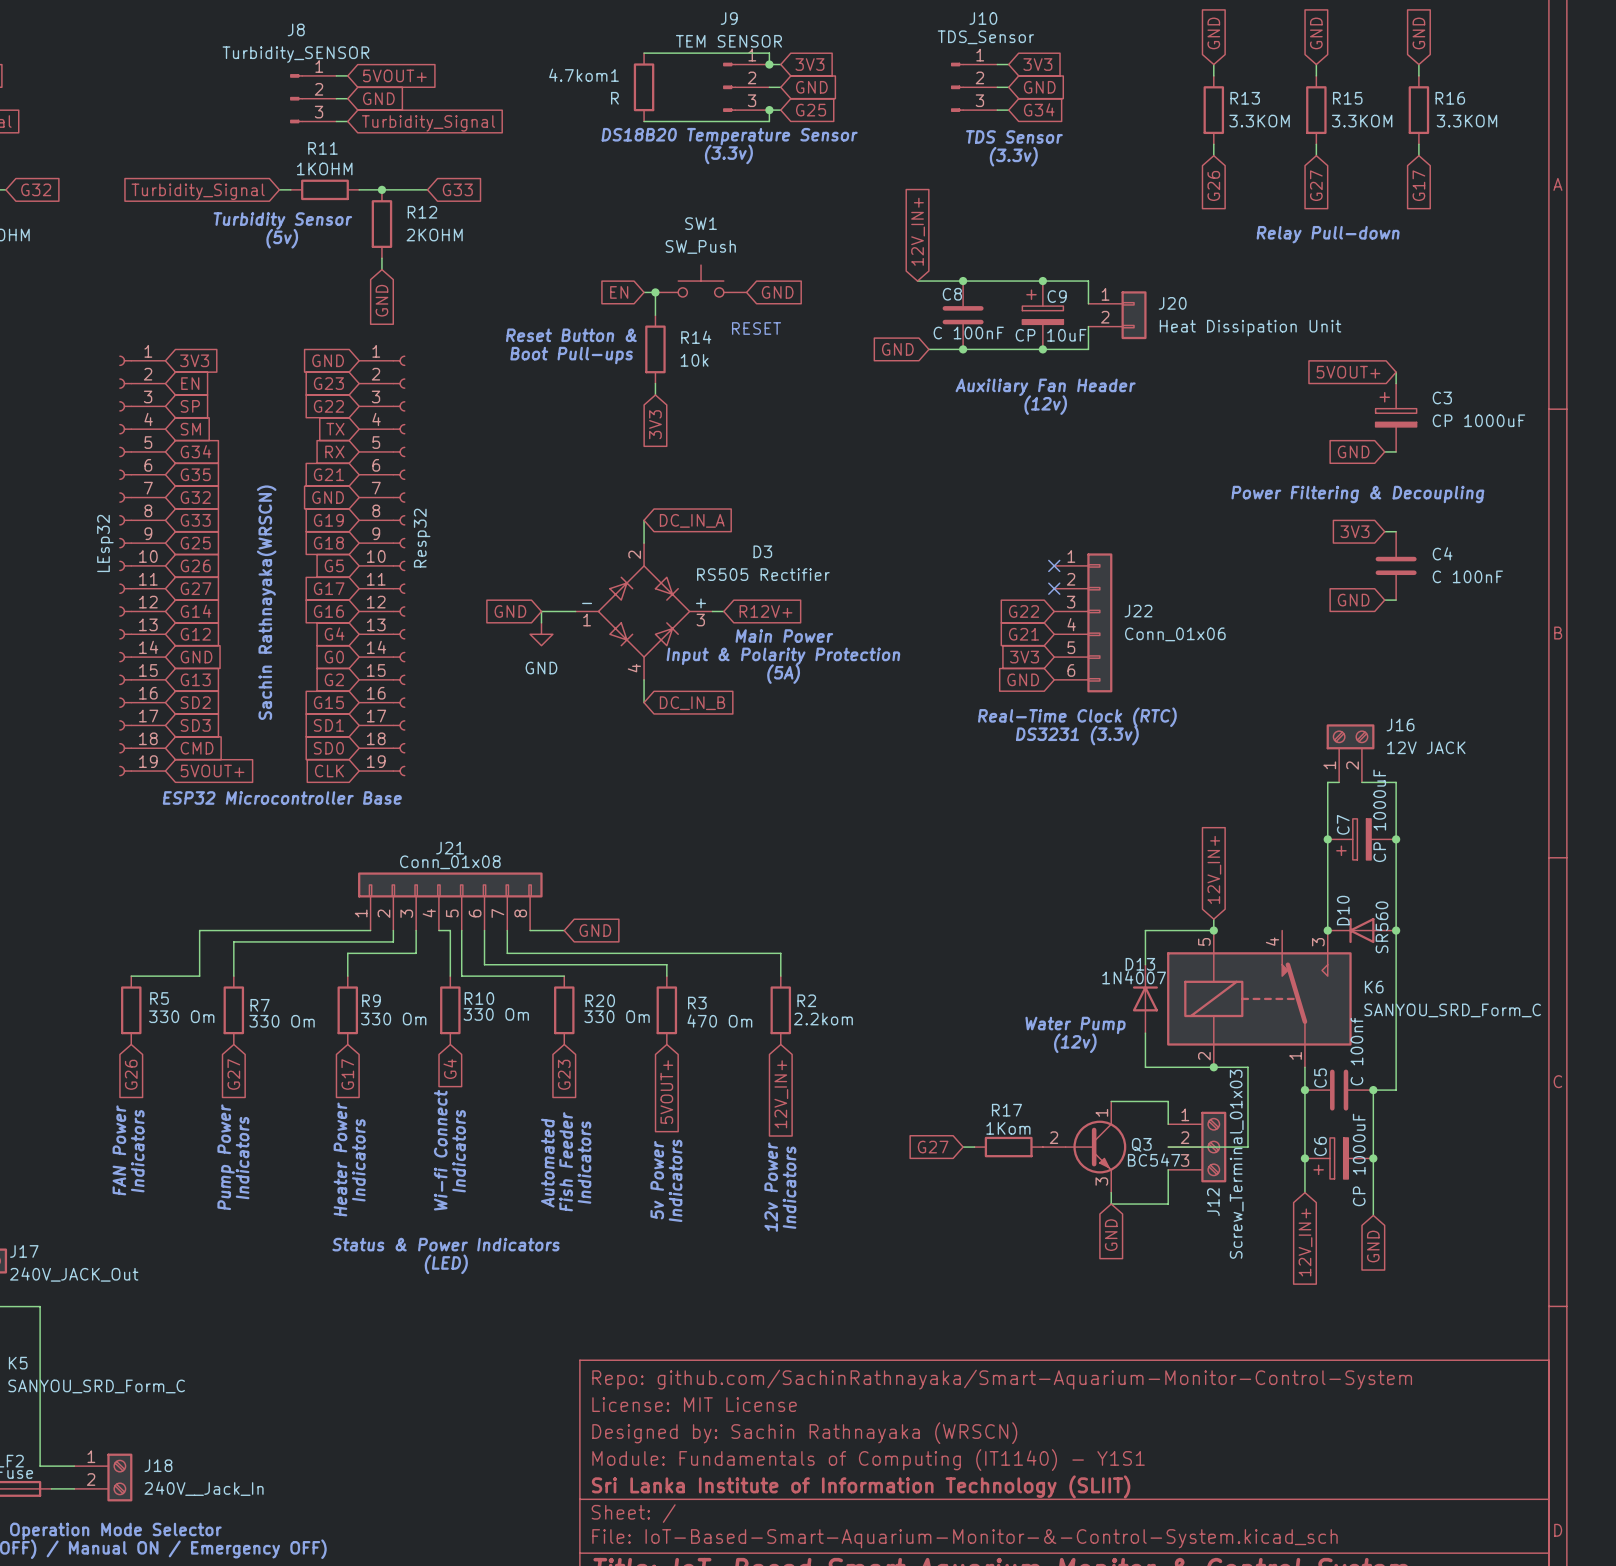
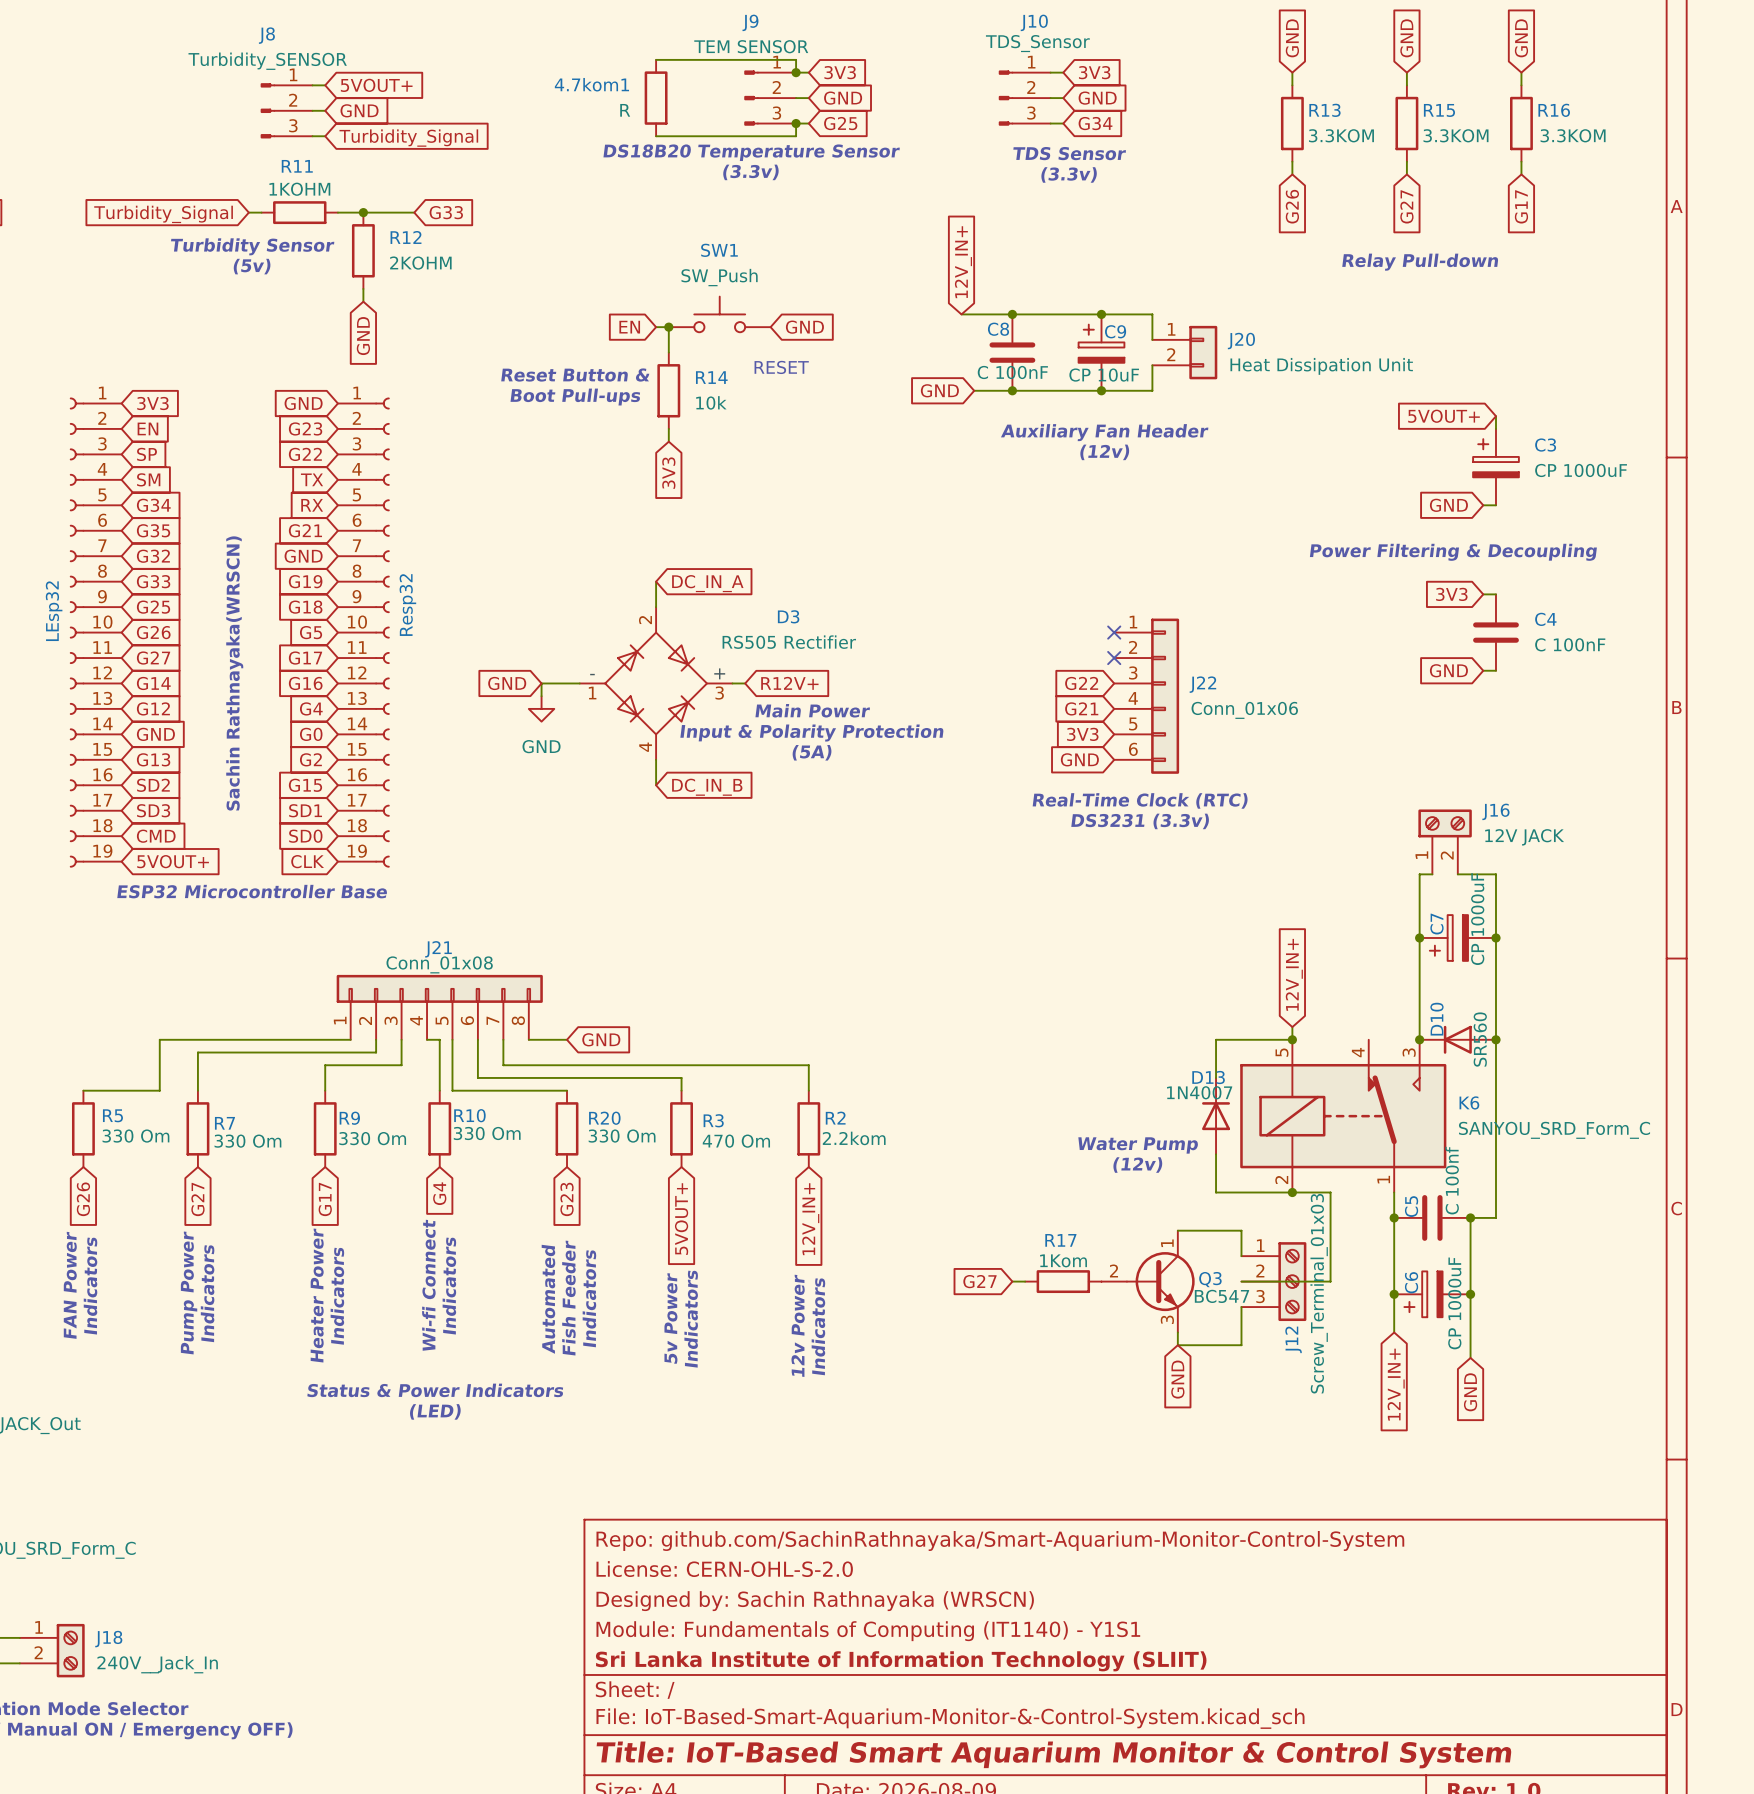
title block: License: MIT License (694, 1404) -> License: CERN-OHL-S-2.0 (724, 1569)

